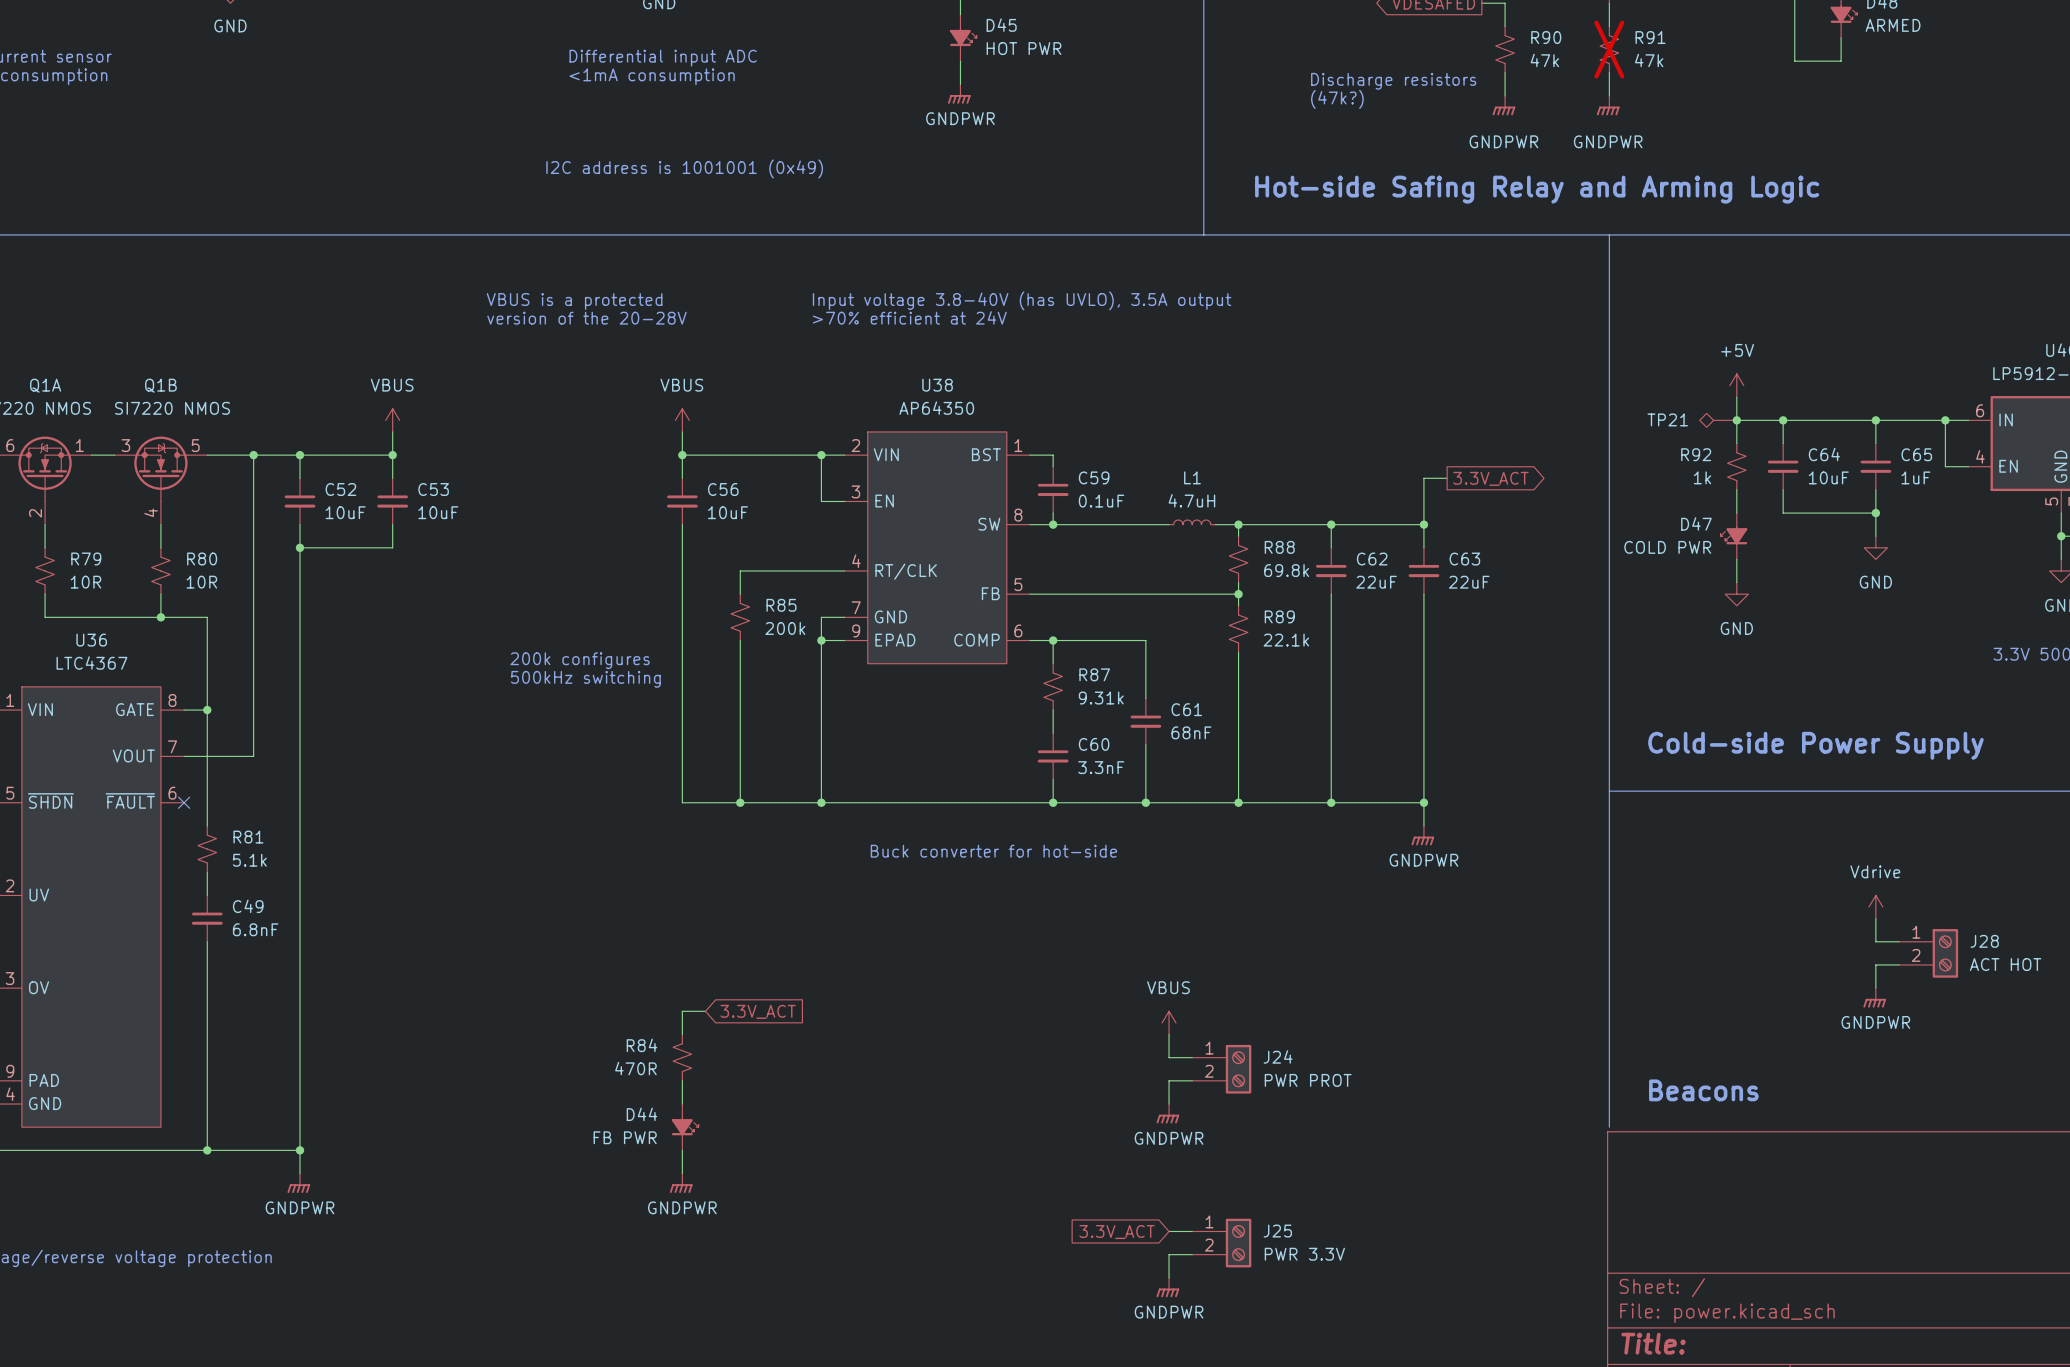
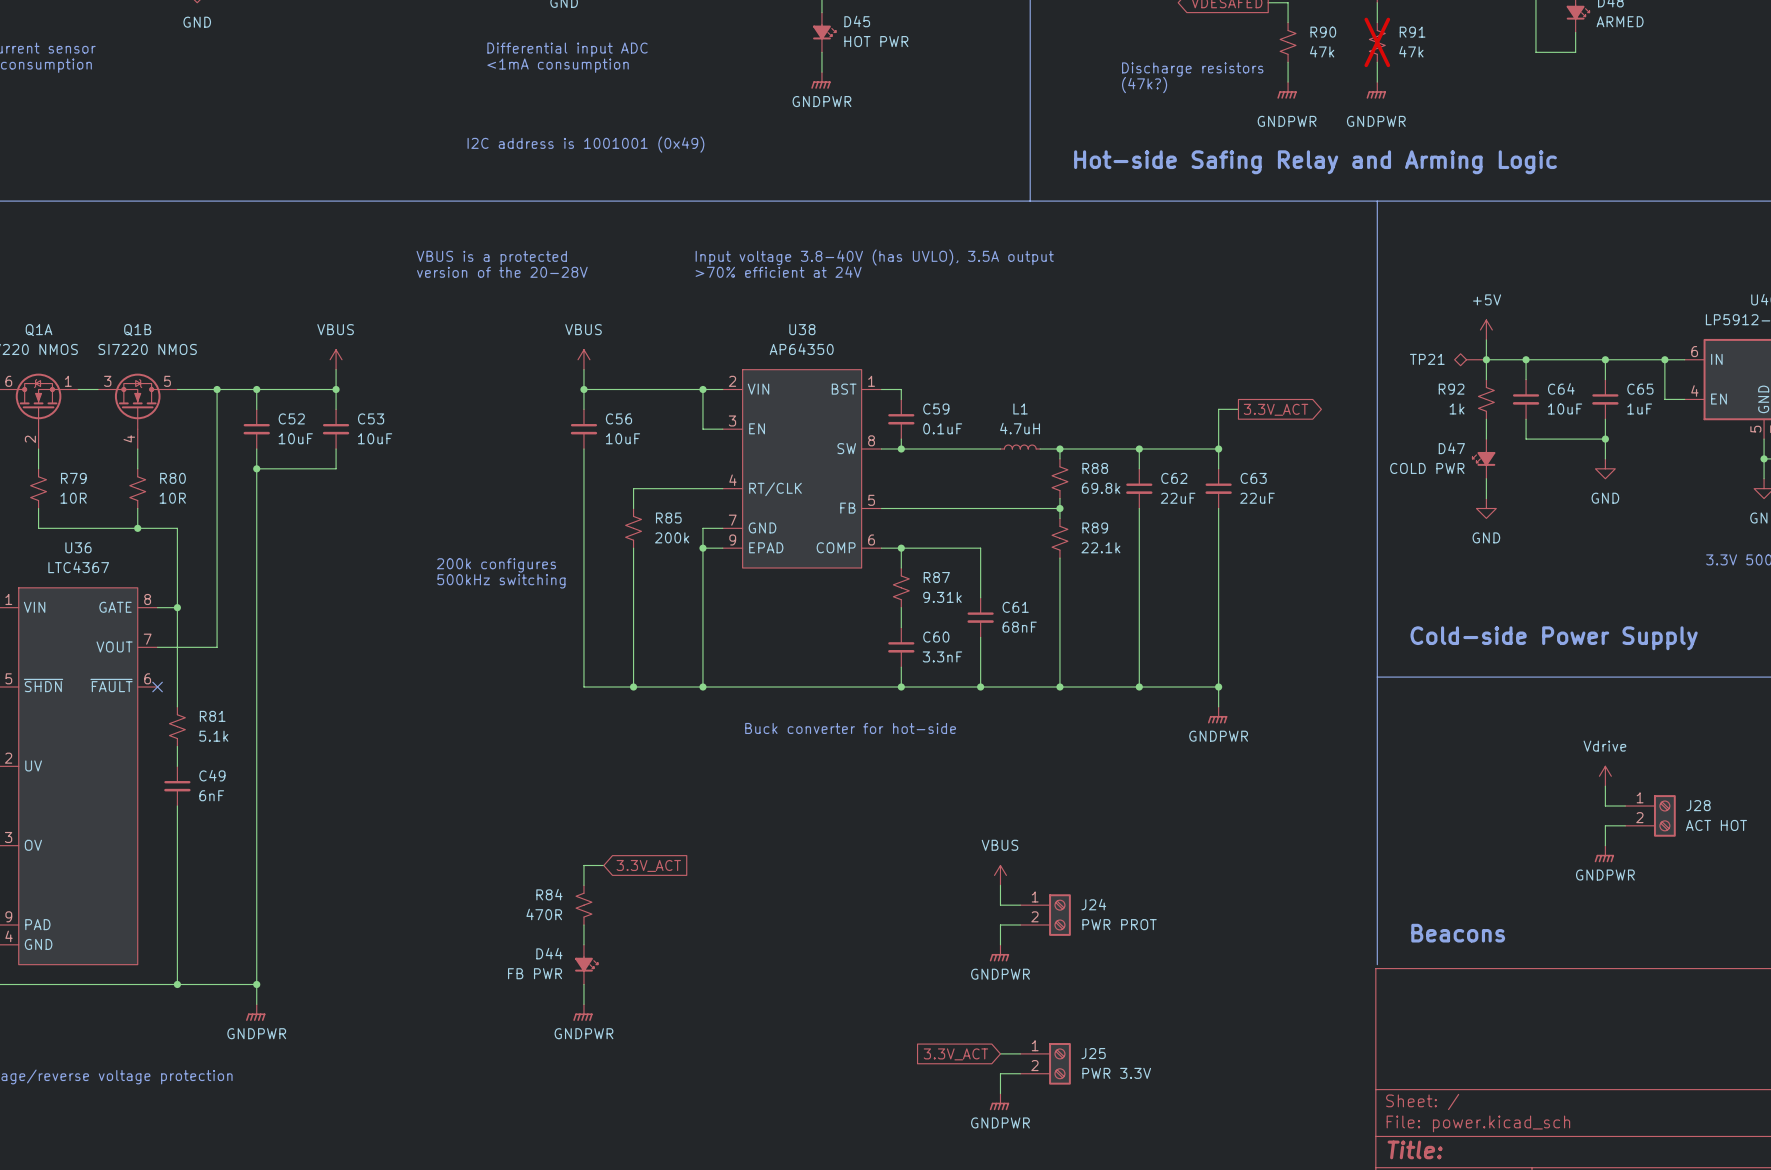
C49 value: 6.8nF (255, 929) -> 6nF (211, 795)

